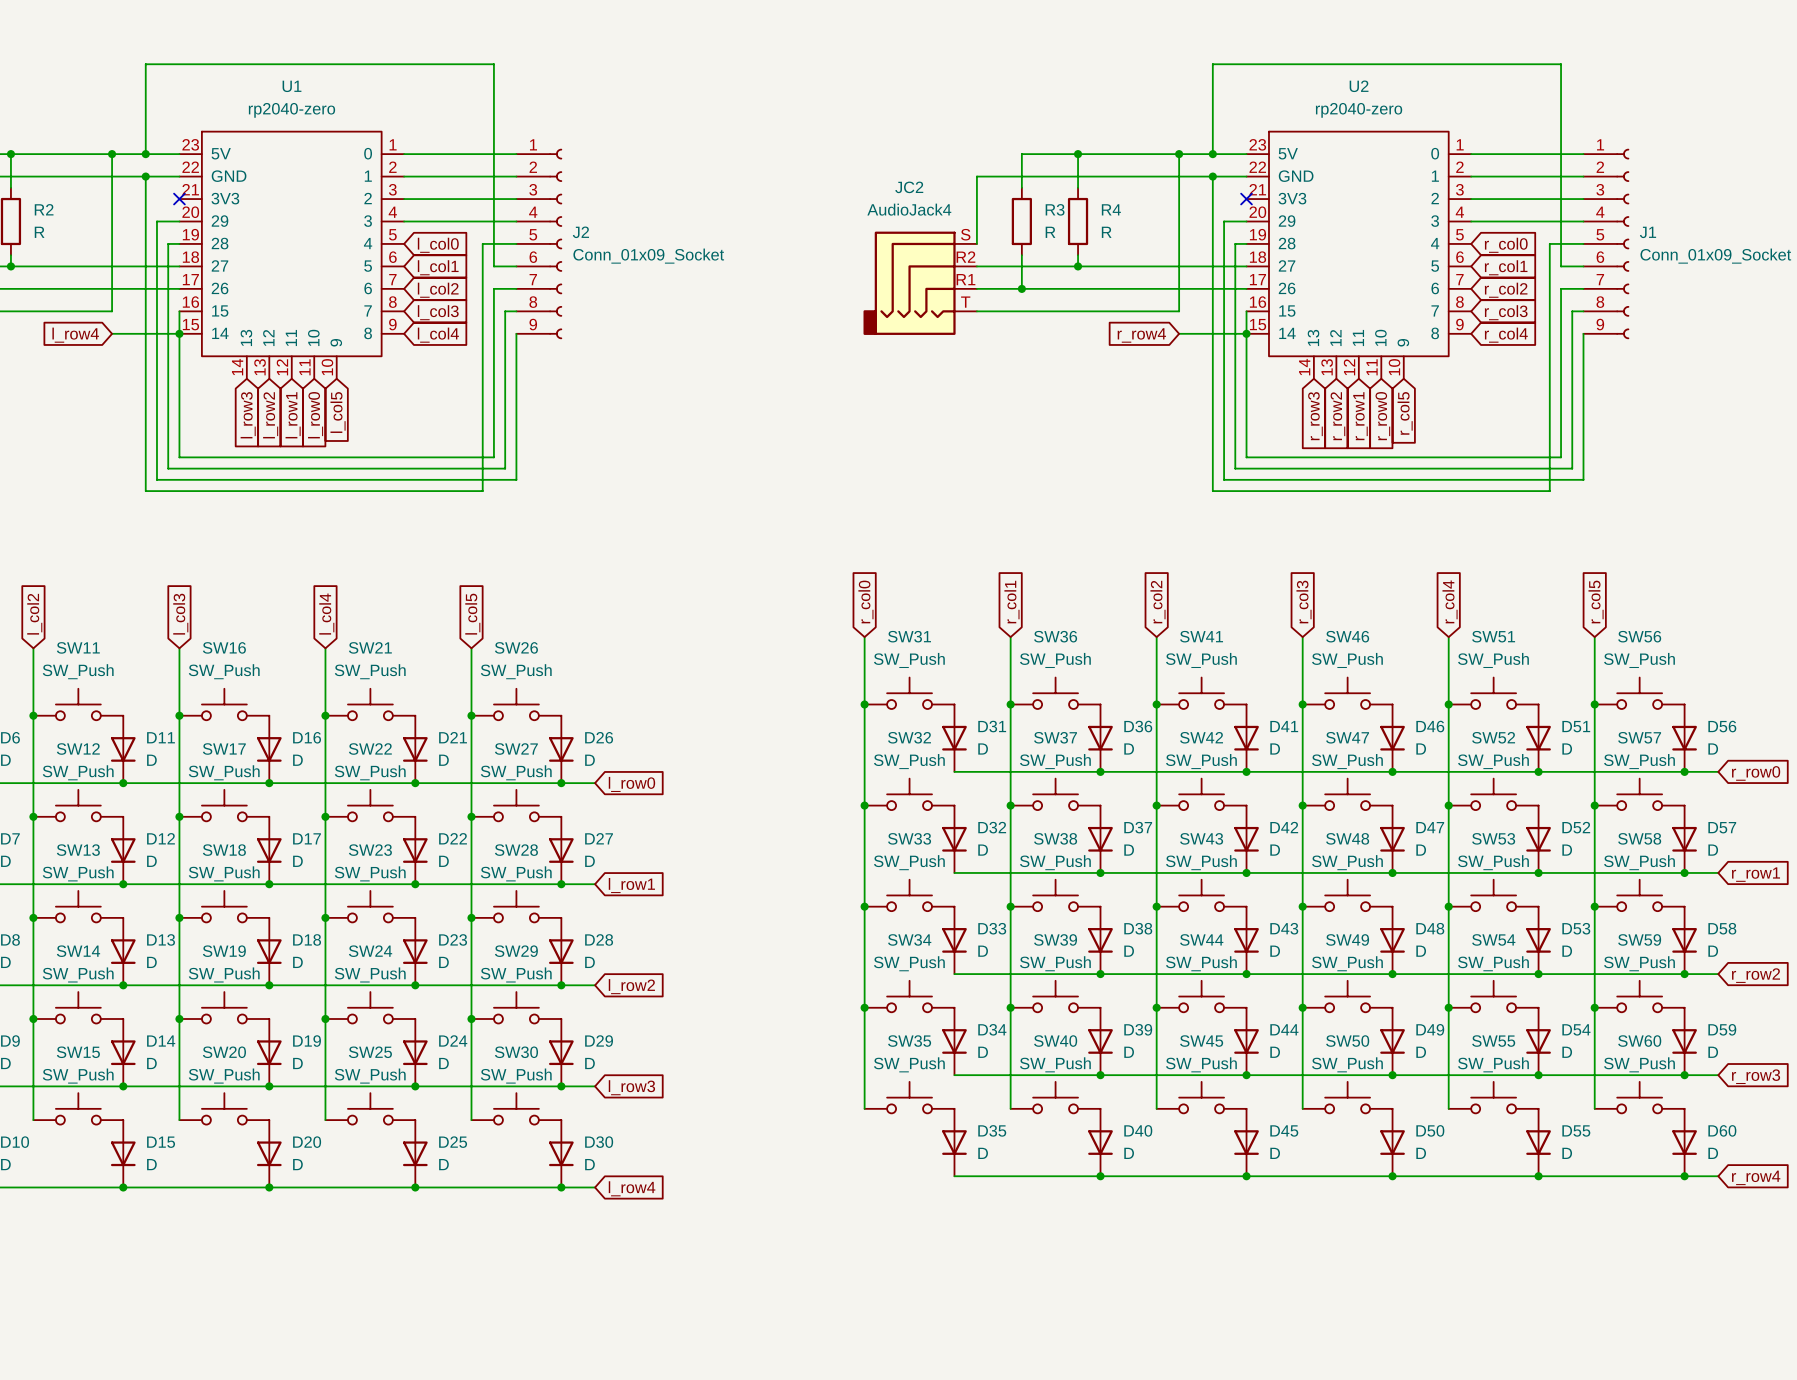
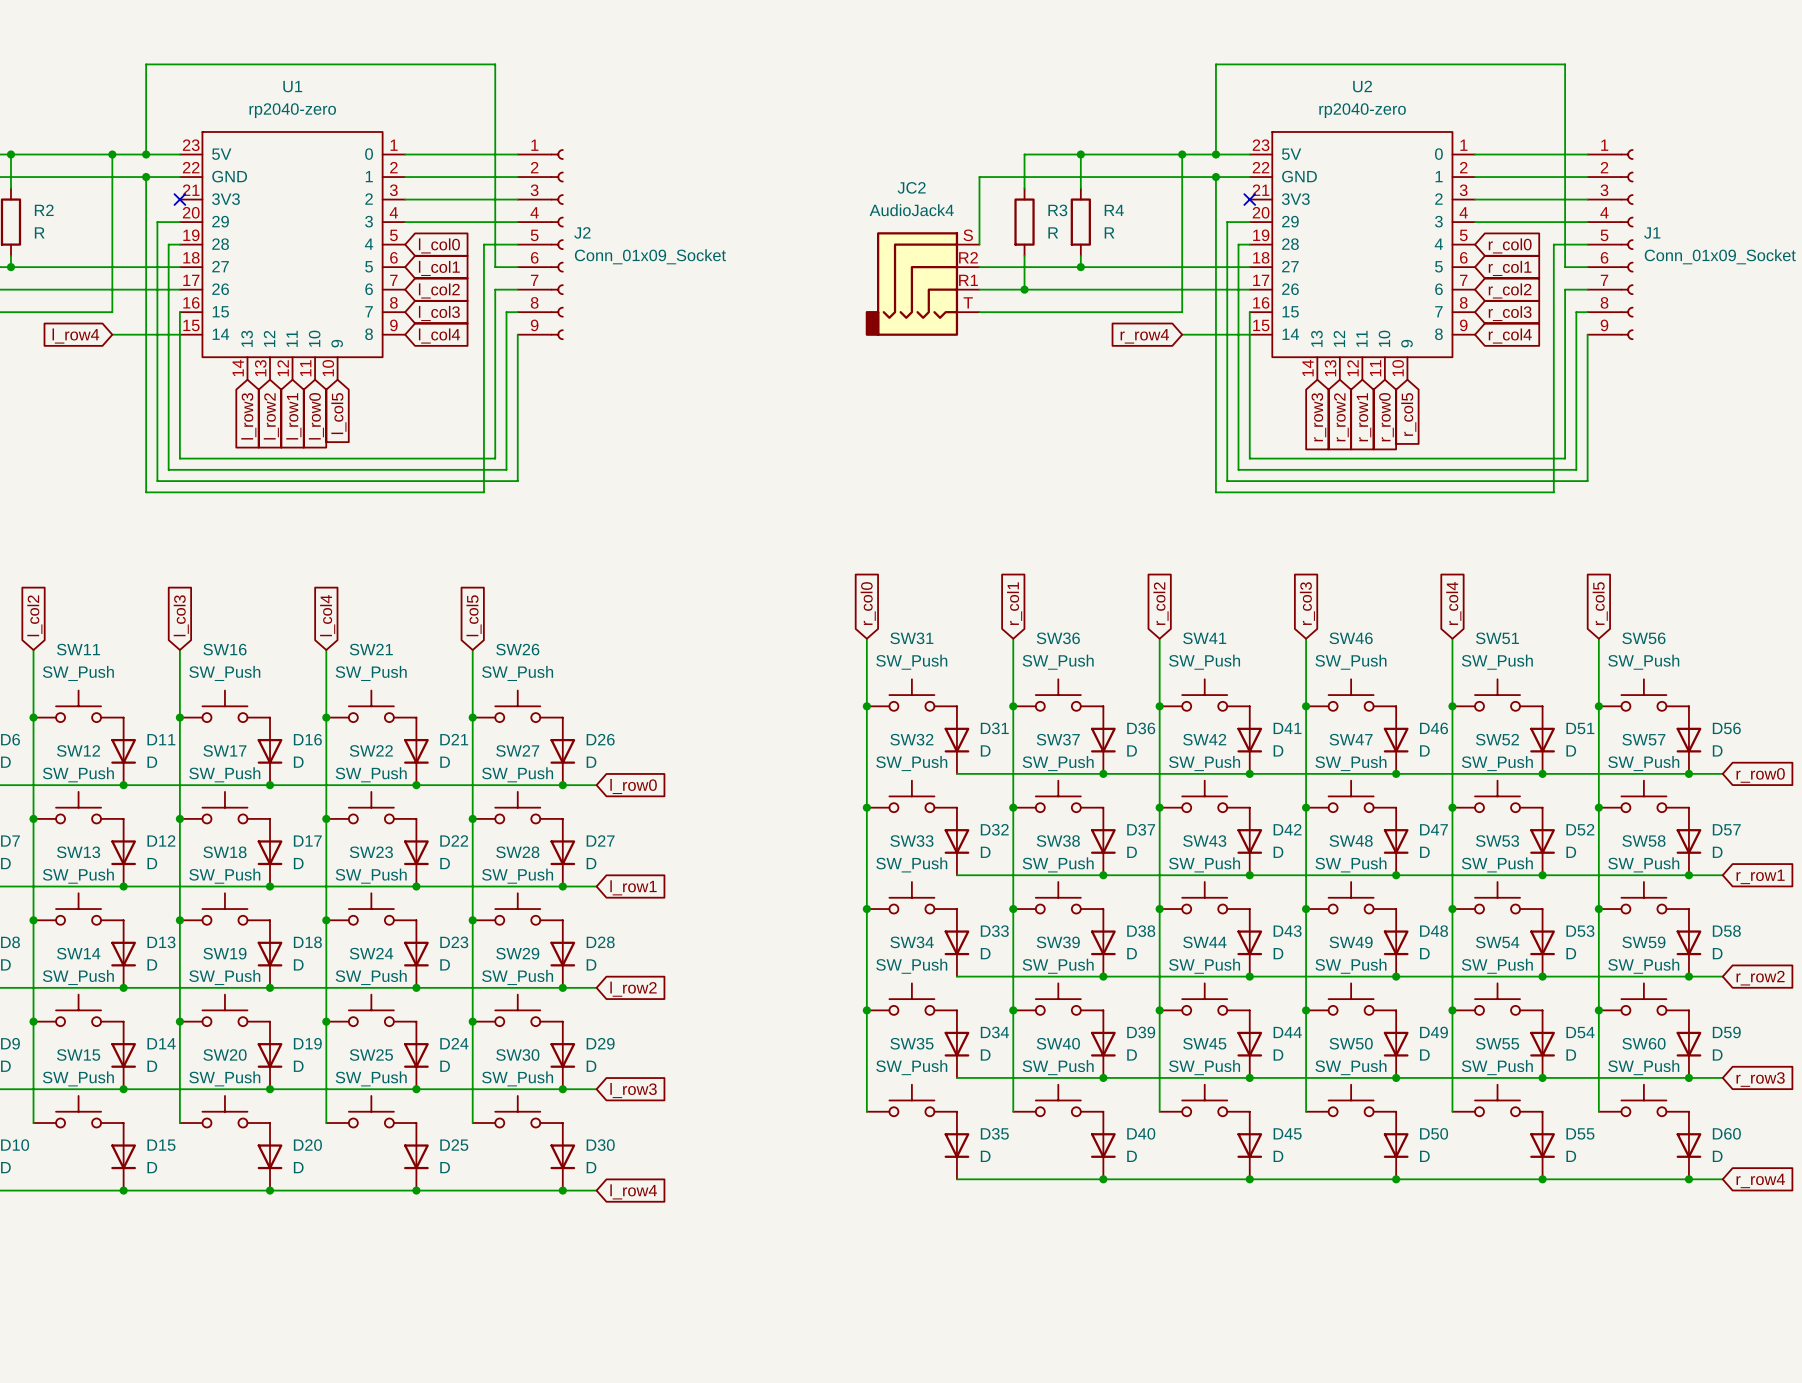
junction: (179, 333) -> none
junction: (1246, 333) -> none

